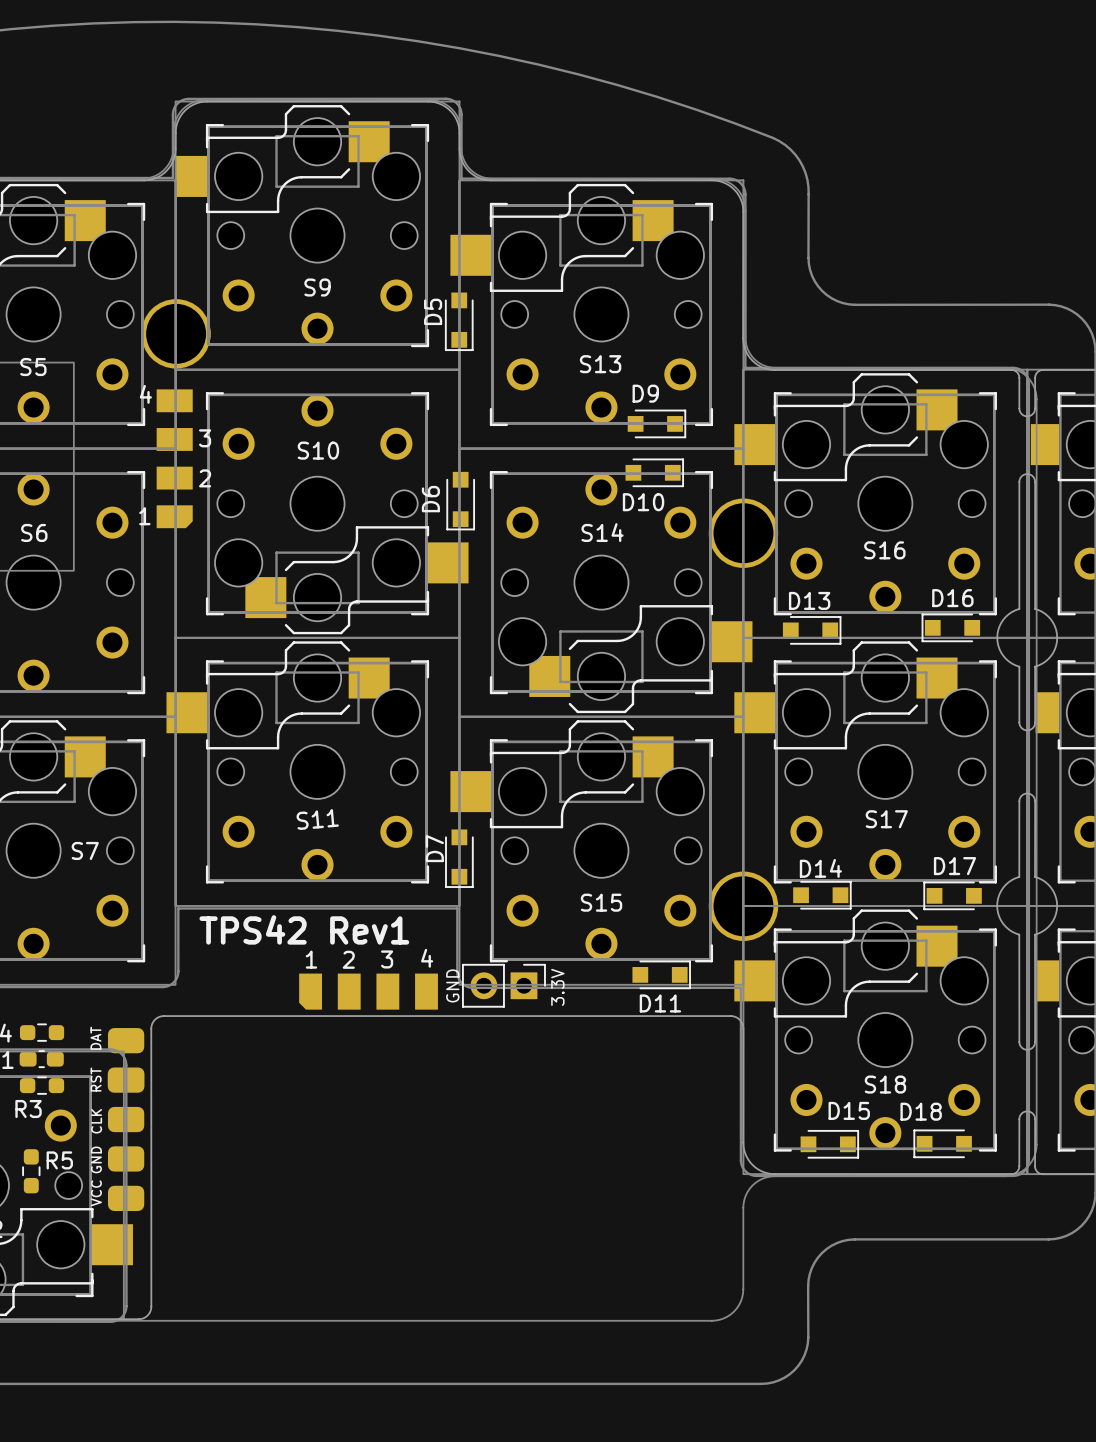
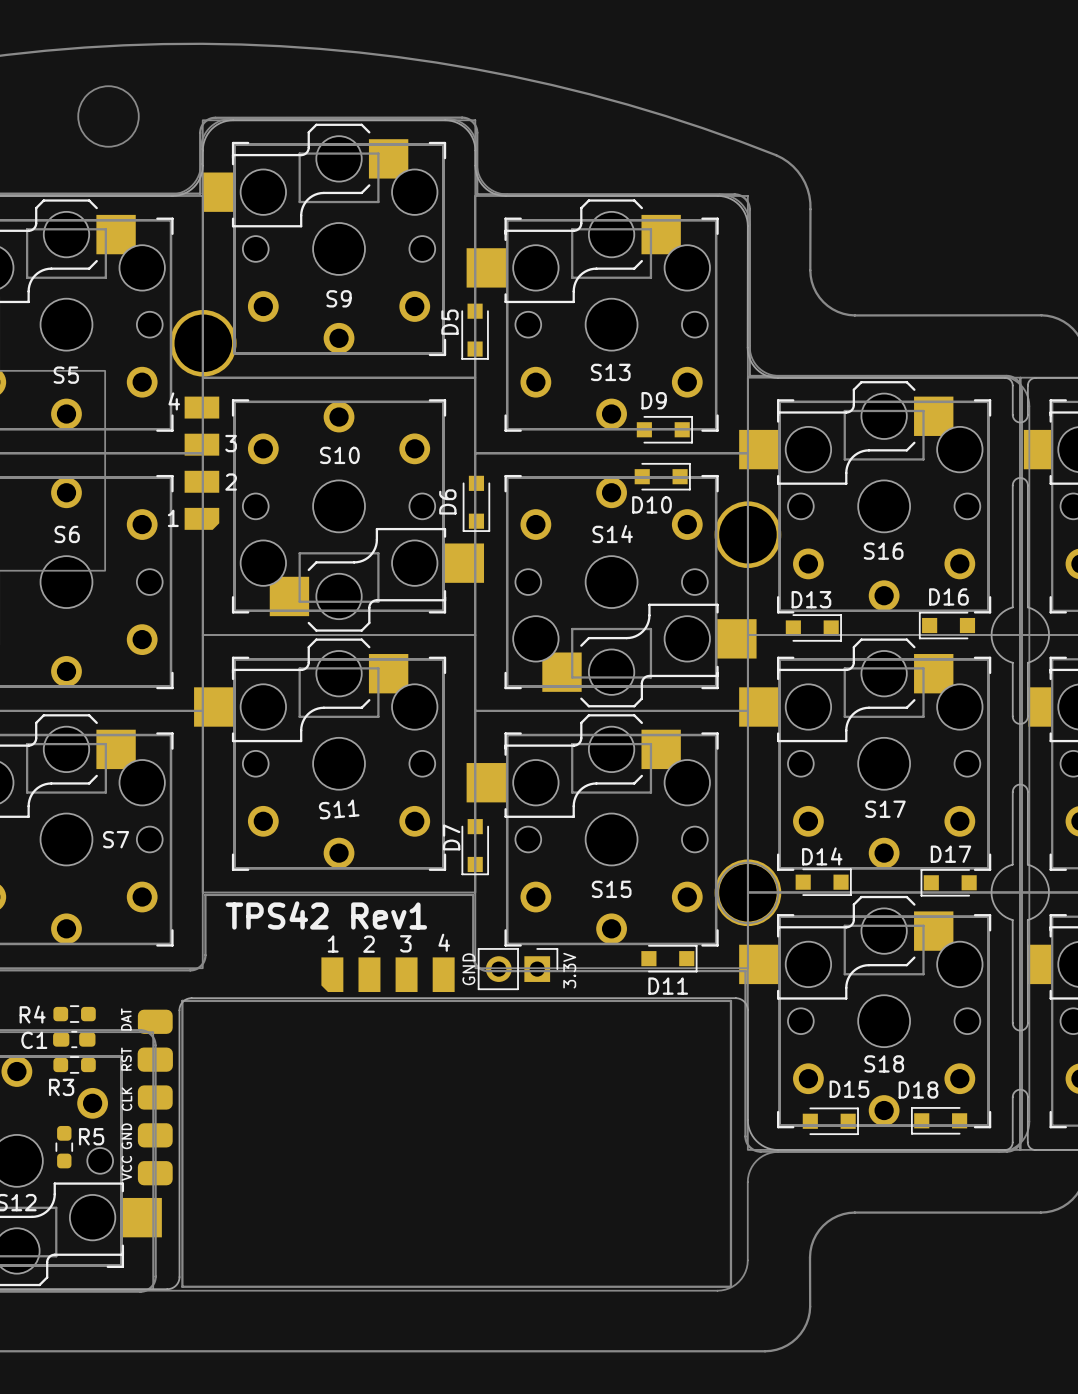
drawing: none -> [77, 85, 140, 148]
drawing: none -> [717, 862, 779, 924]
line: none -> (182, 1000) (730, 1000) (730, 1286) (182, 1286) (182, 1000)

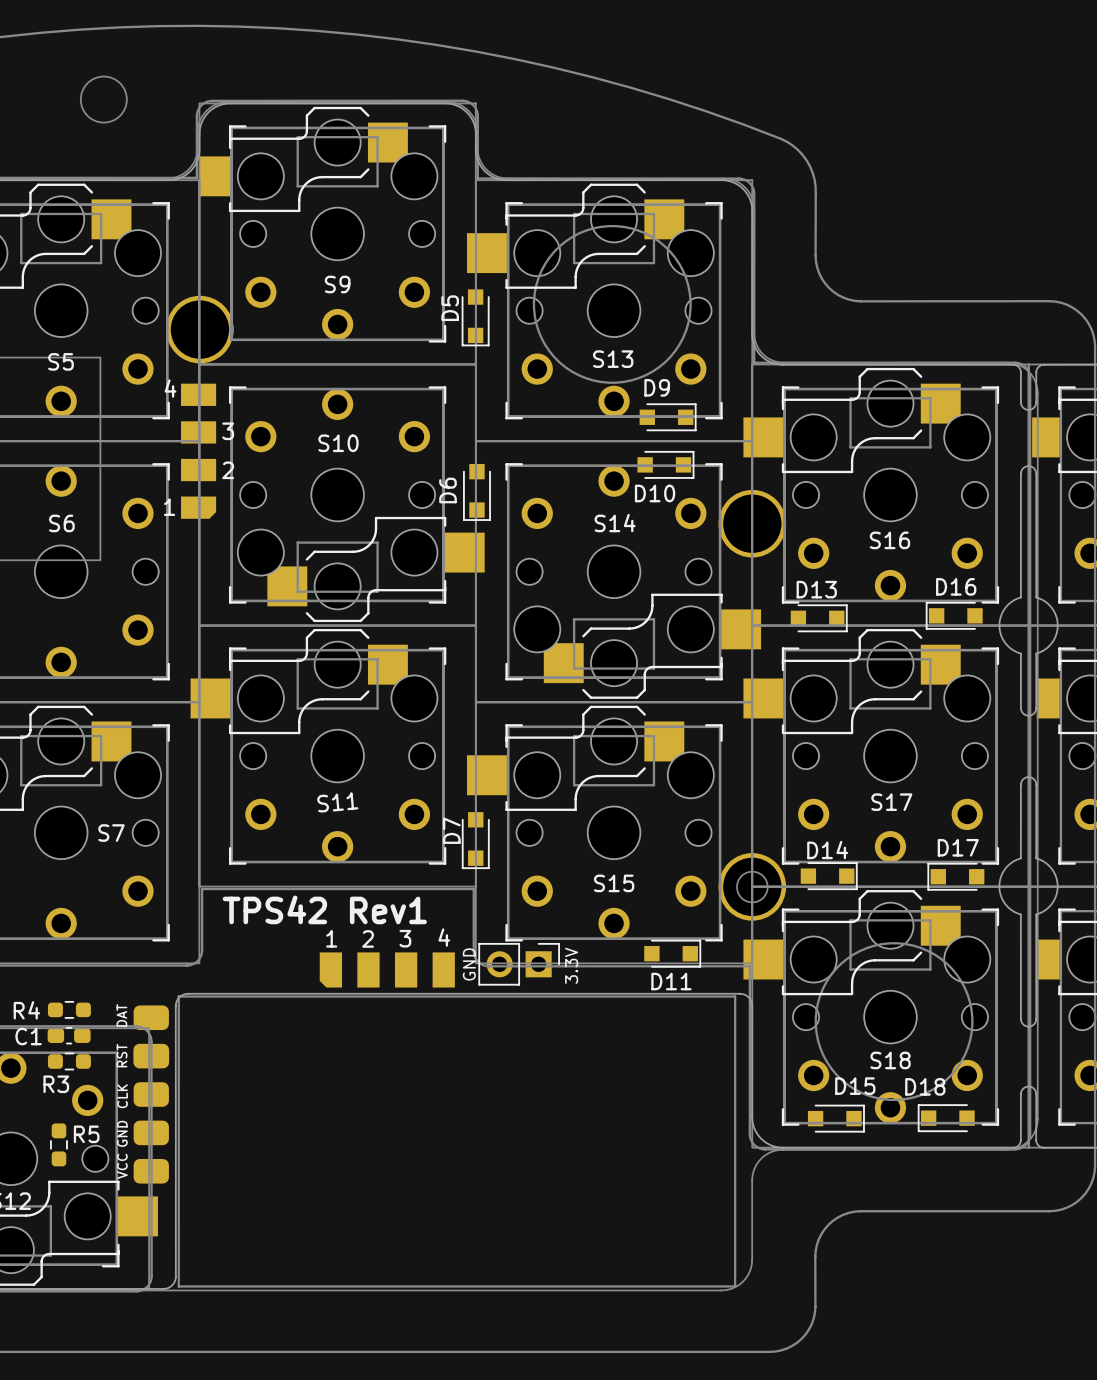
drawing shape: [77, 85, 140, 148] -> [80, 76, 128, 123]
drawing: none -> [532, 224, 692, 384]
drawing shape: [717, 862, 779, 924] -> [736, 871, 769, 903]
drawing: none -> [814, 942, 974, 1102]

